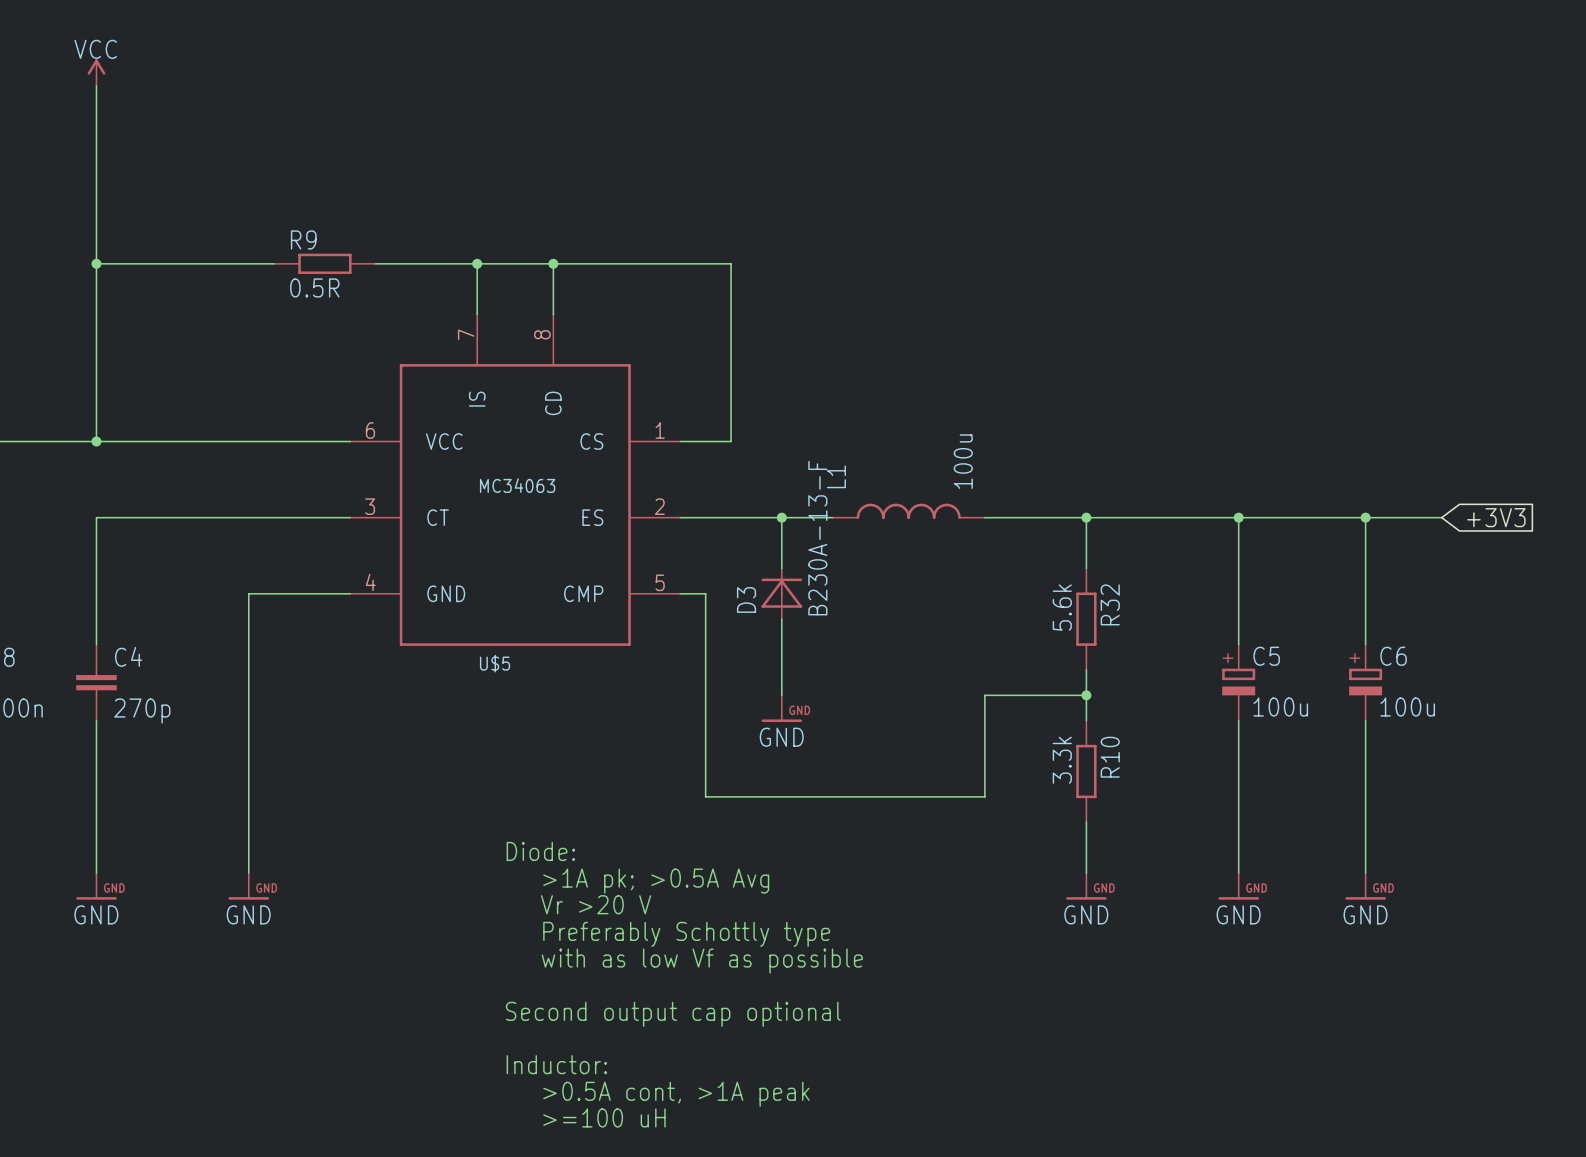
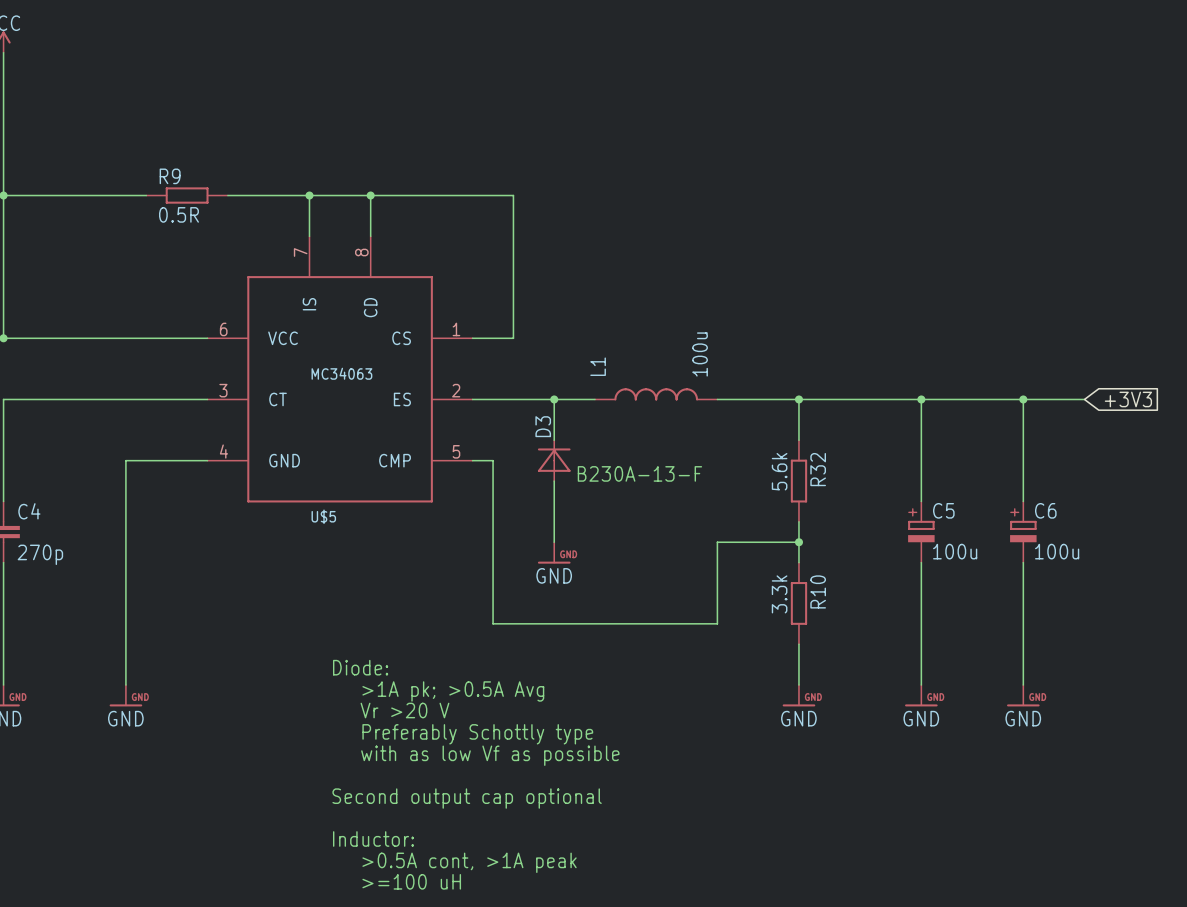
D3 value: B230A-13-F (817, 538) -> none
D3 name position: D3 (746, 599) -> D3 (543, 426)
text: none -> B230A-13-F (639, 473)

